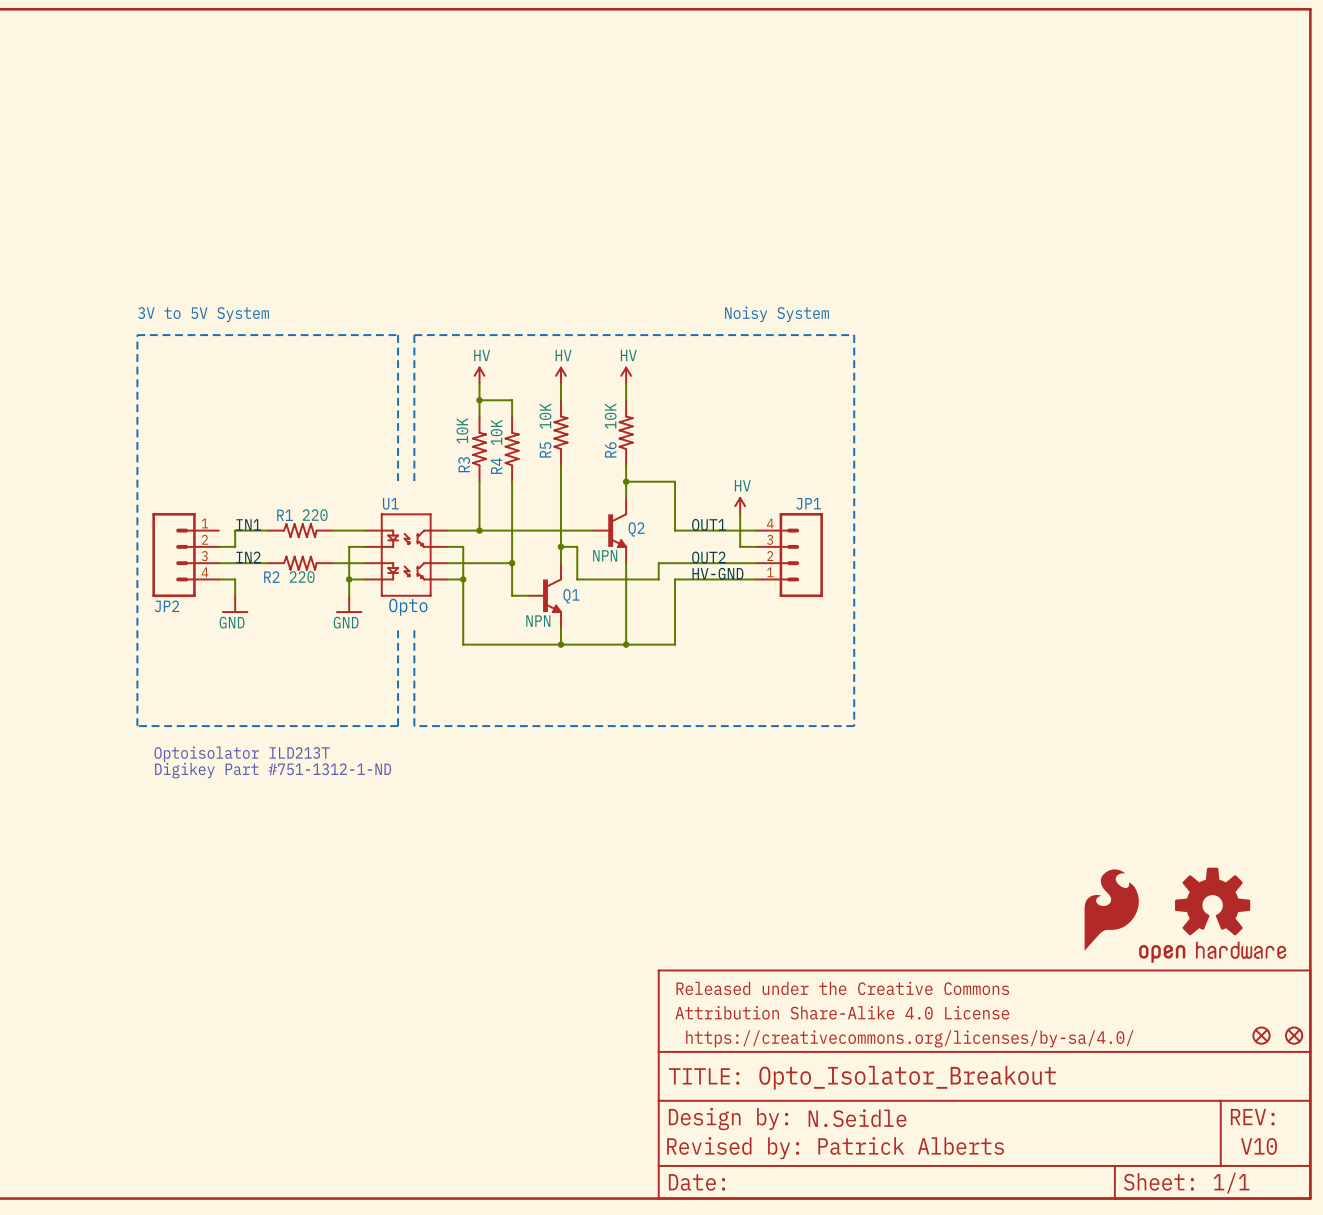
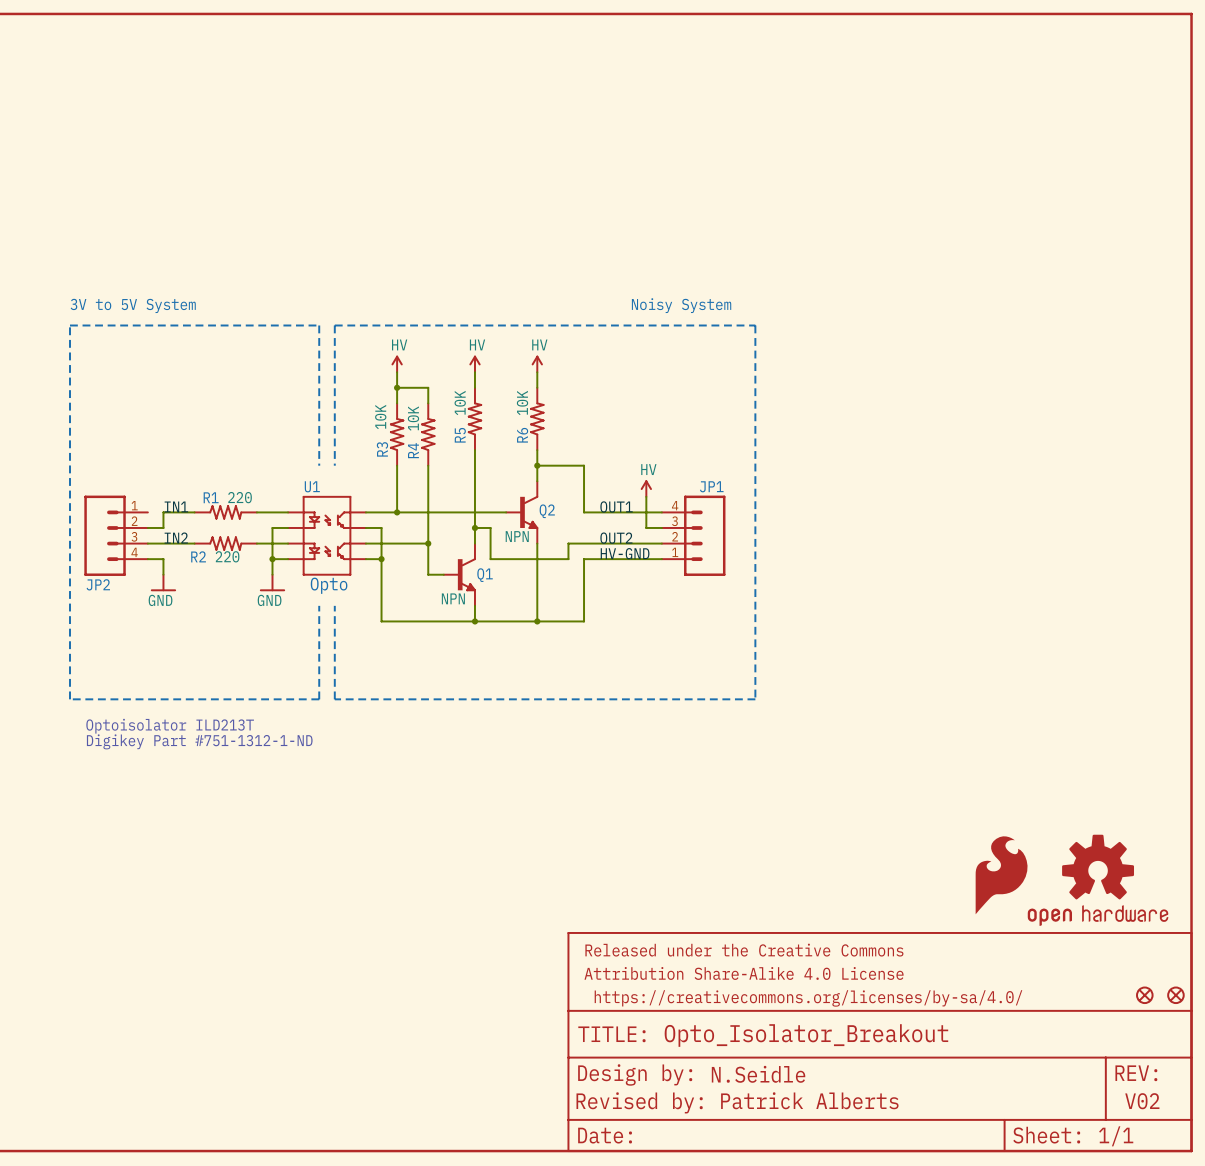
text: V10 (1259, 1146) -> V02 (1142, 1101)

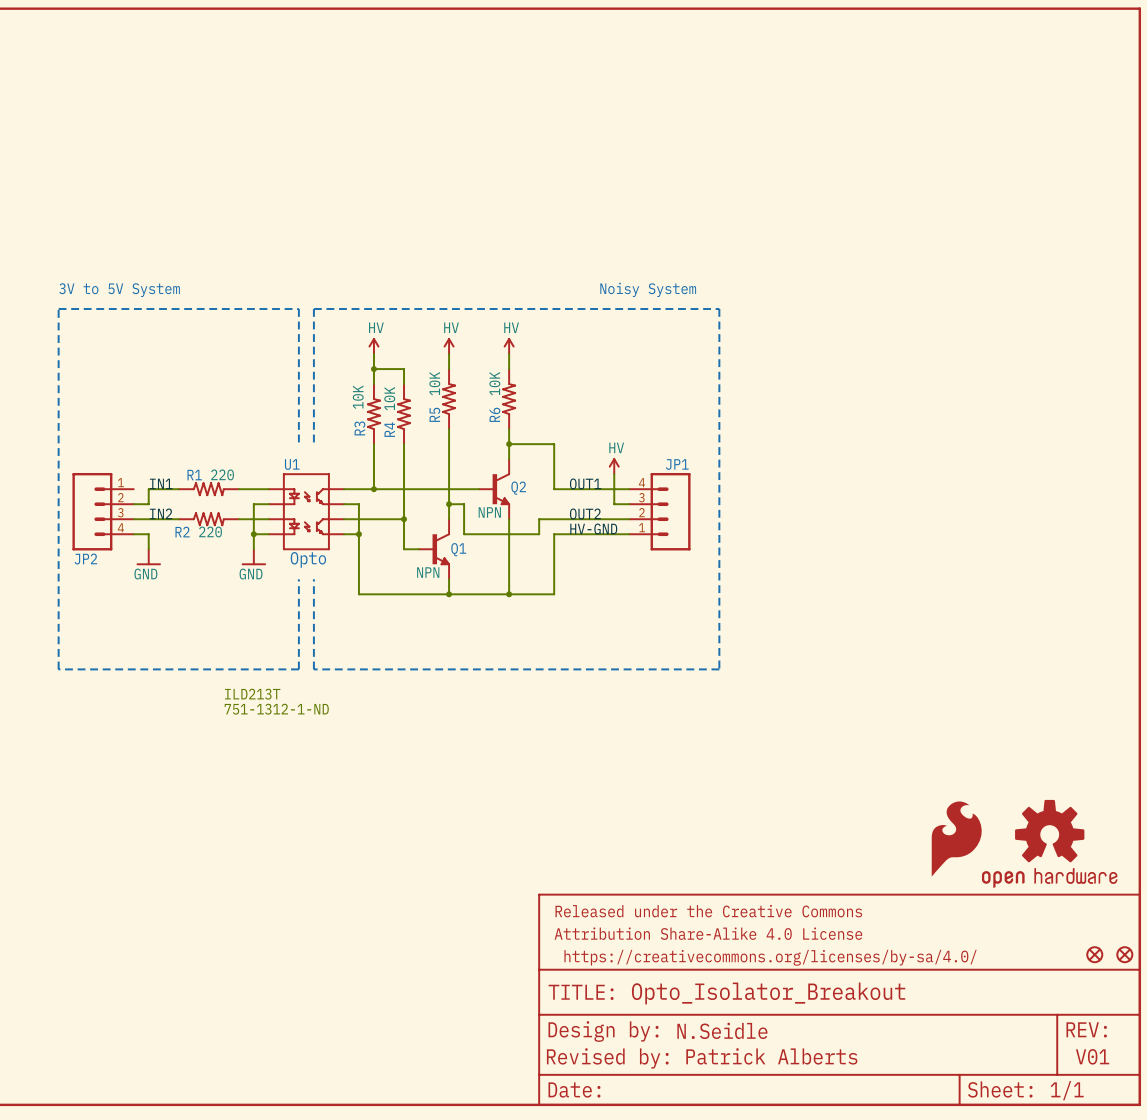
text: none -> ILD213T (252, 694)
text: Optoisolator ILD213T (170, 726) -> none
text: none -> 751-1312-1-ND (276, 709)
text: Digikey Part #751-1312-1-ND (199, 741) -> none
text: V02 (1142, 1101) -> V01 (1092, 1056)

